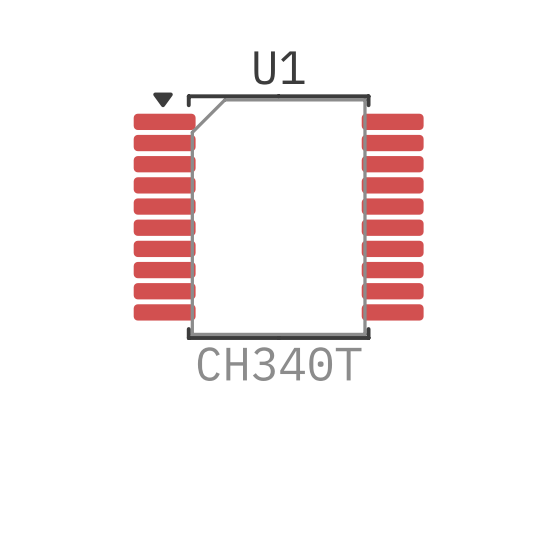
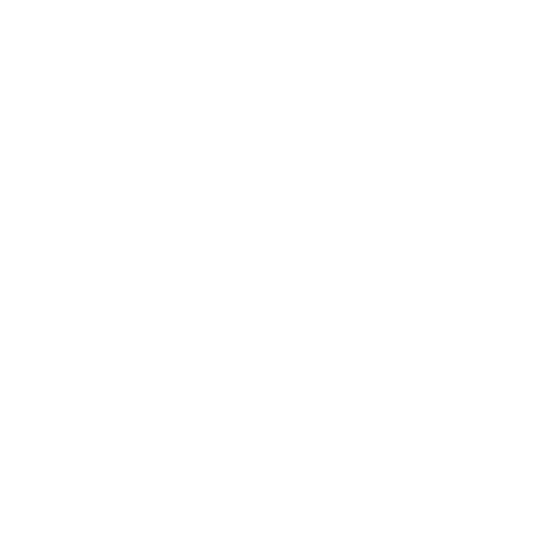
U1: CH340T (278, 216) -> none

